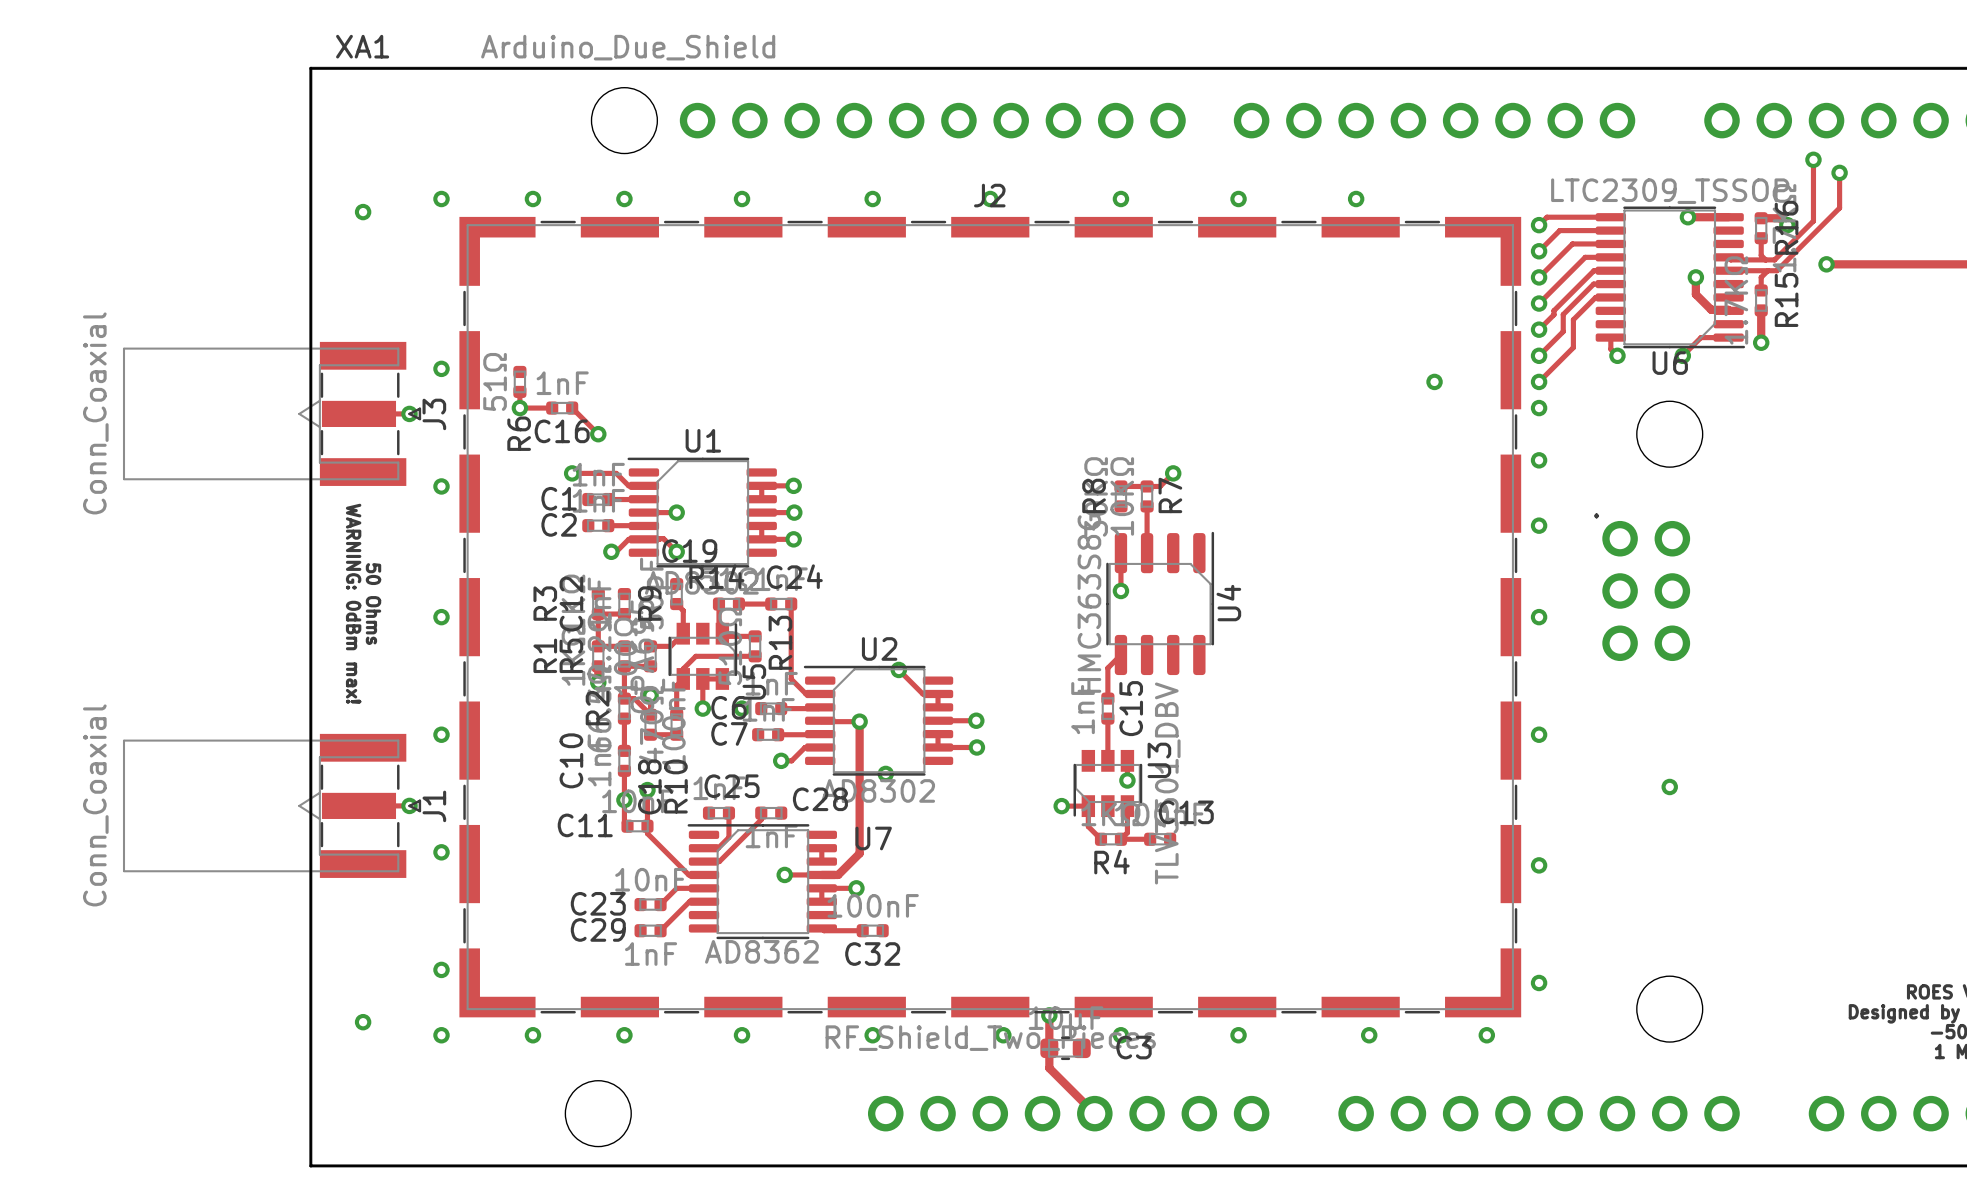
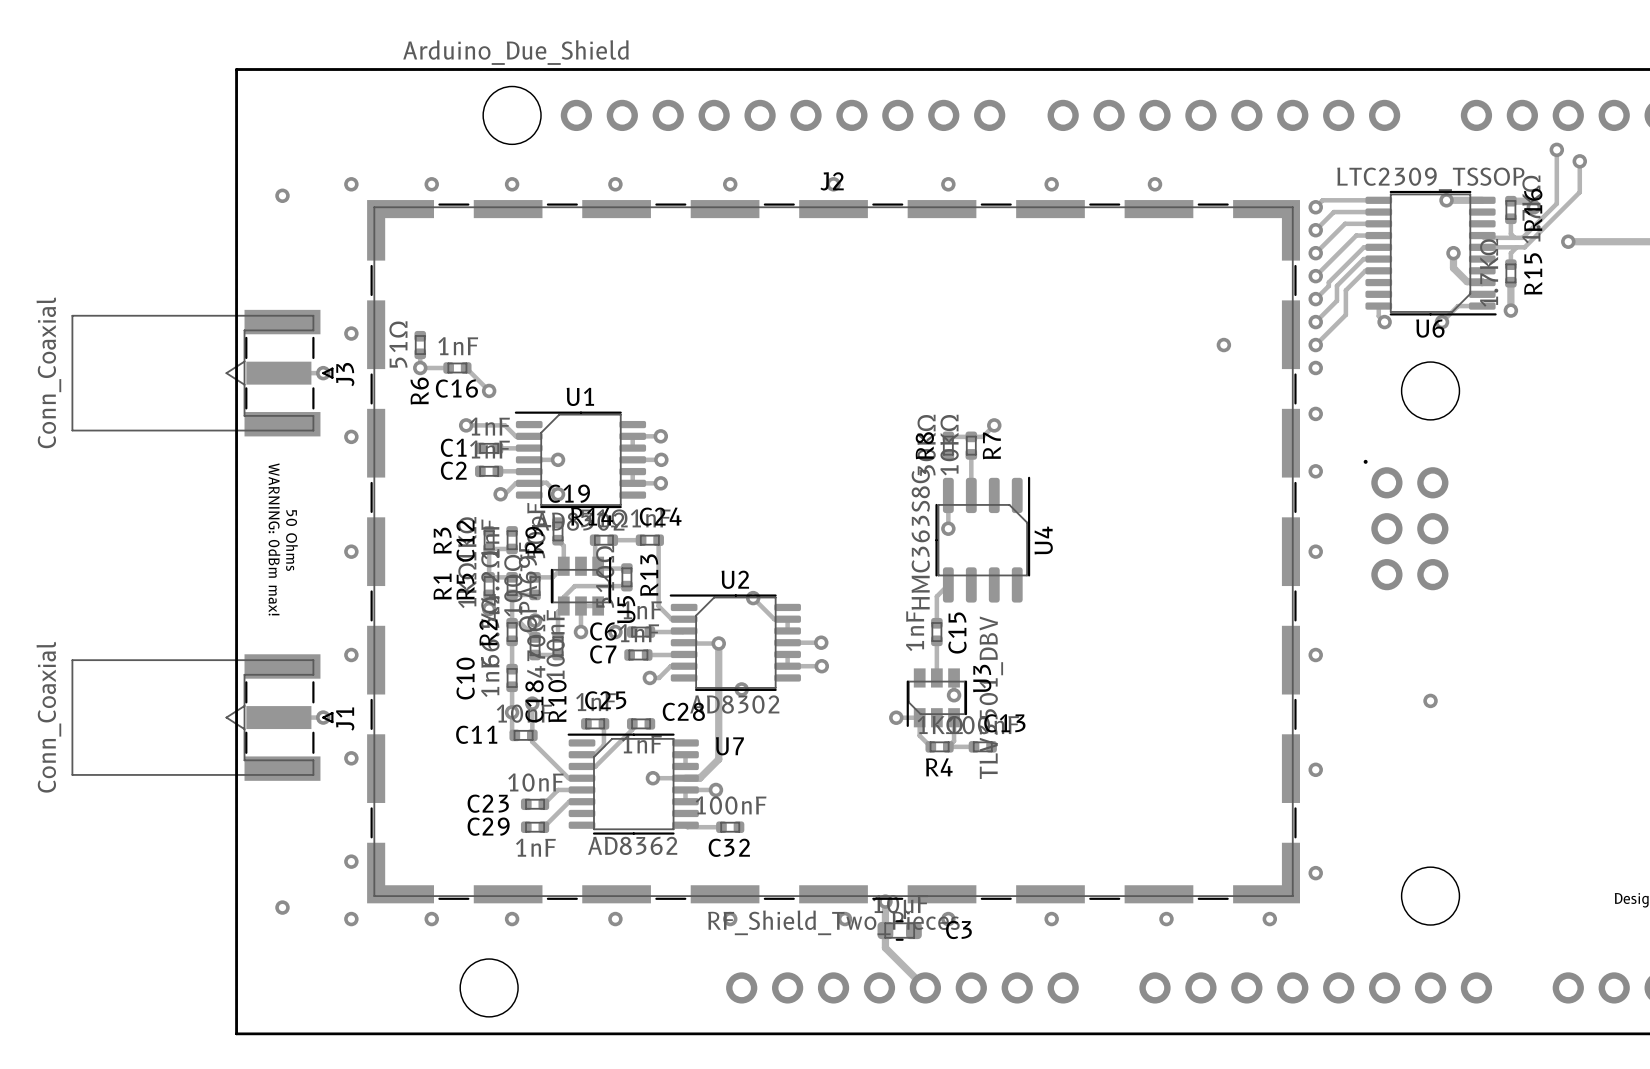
XA1 name: XA1 (362, 46) -> none

